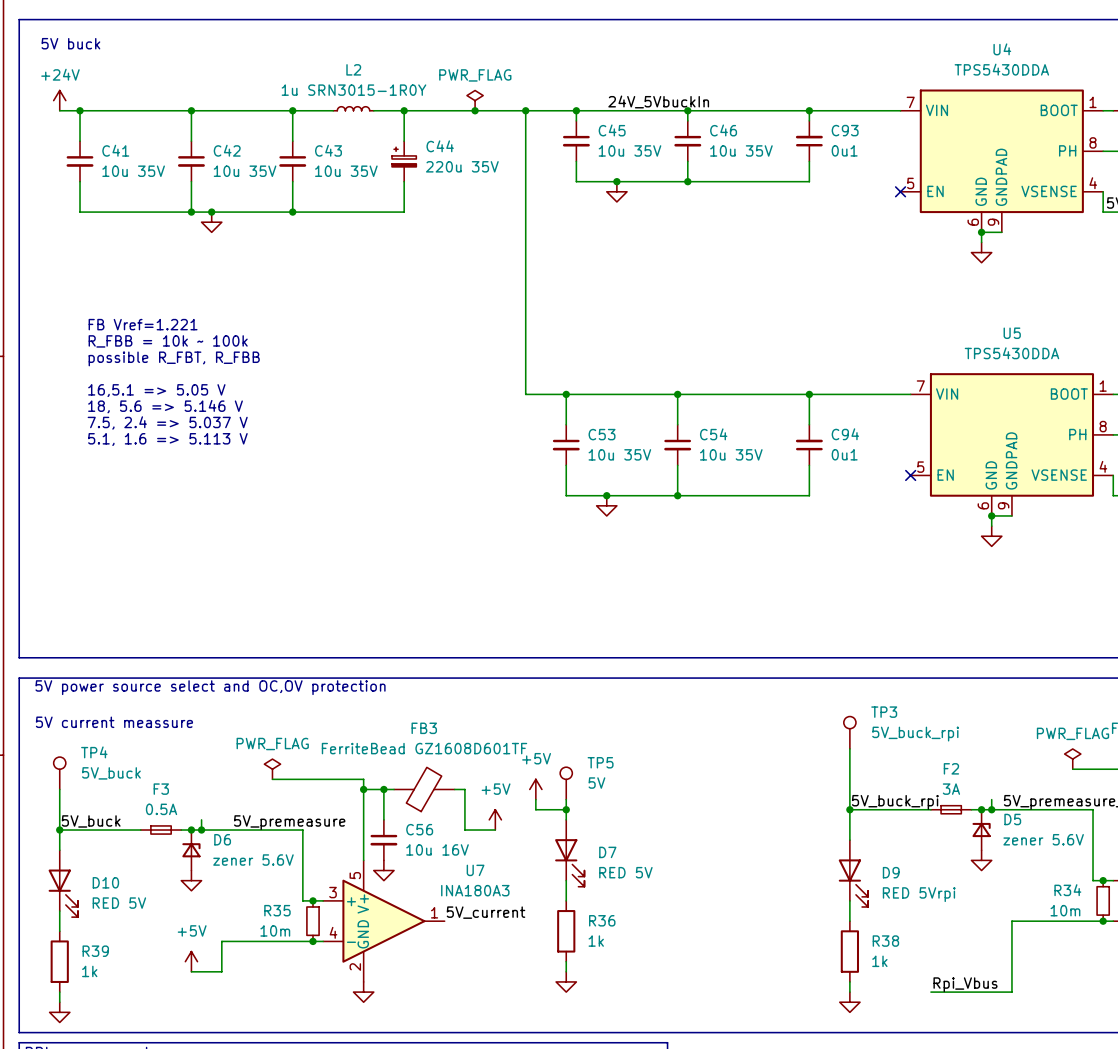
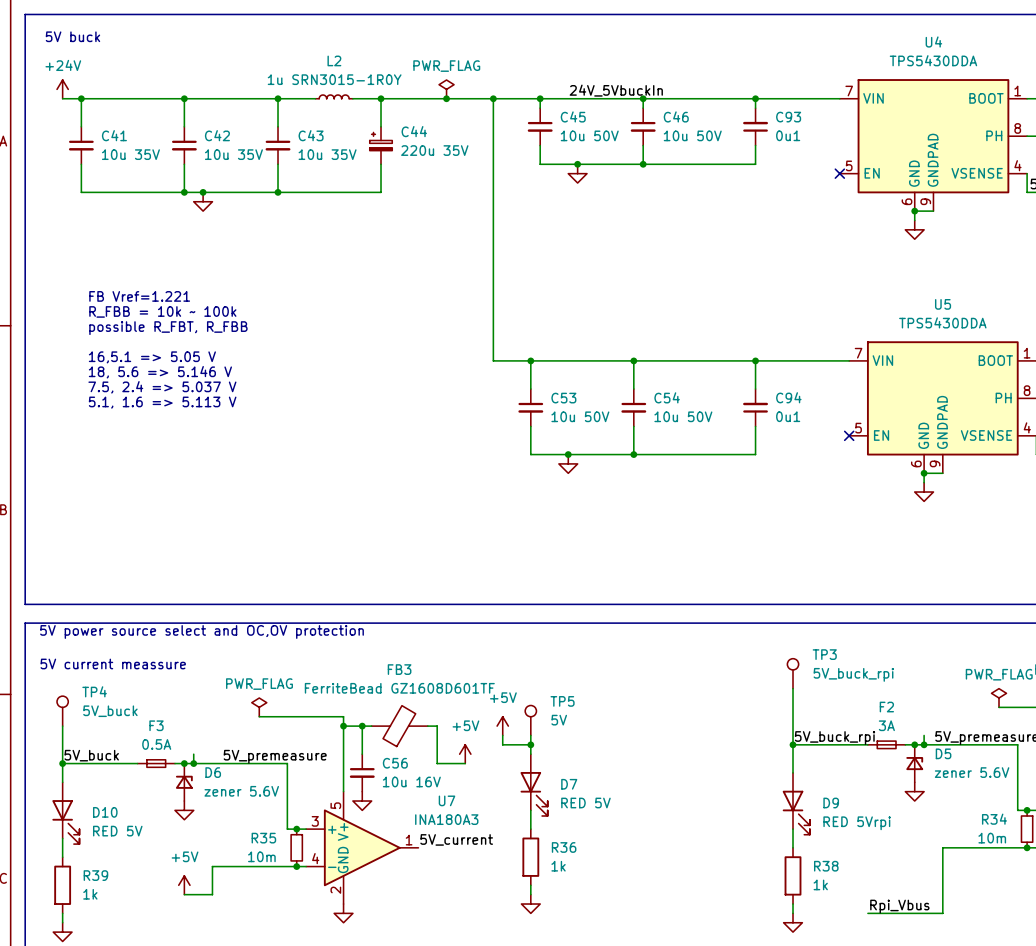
C45 value: 10u 35V (630, 150) -> 10u 50V (589, 135)
C46 value: 10u 35V (741, 150) -> 10u 50V (692, 135)
C53 value: 10u 35V (619, 454) -> 10u 50V (580, 416)
C54 value: 10u 35V (731, 454) -> 10u 50V (683, 416)

